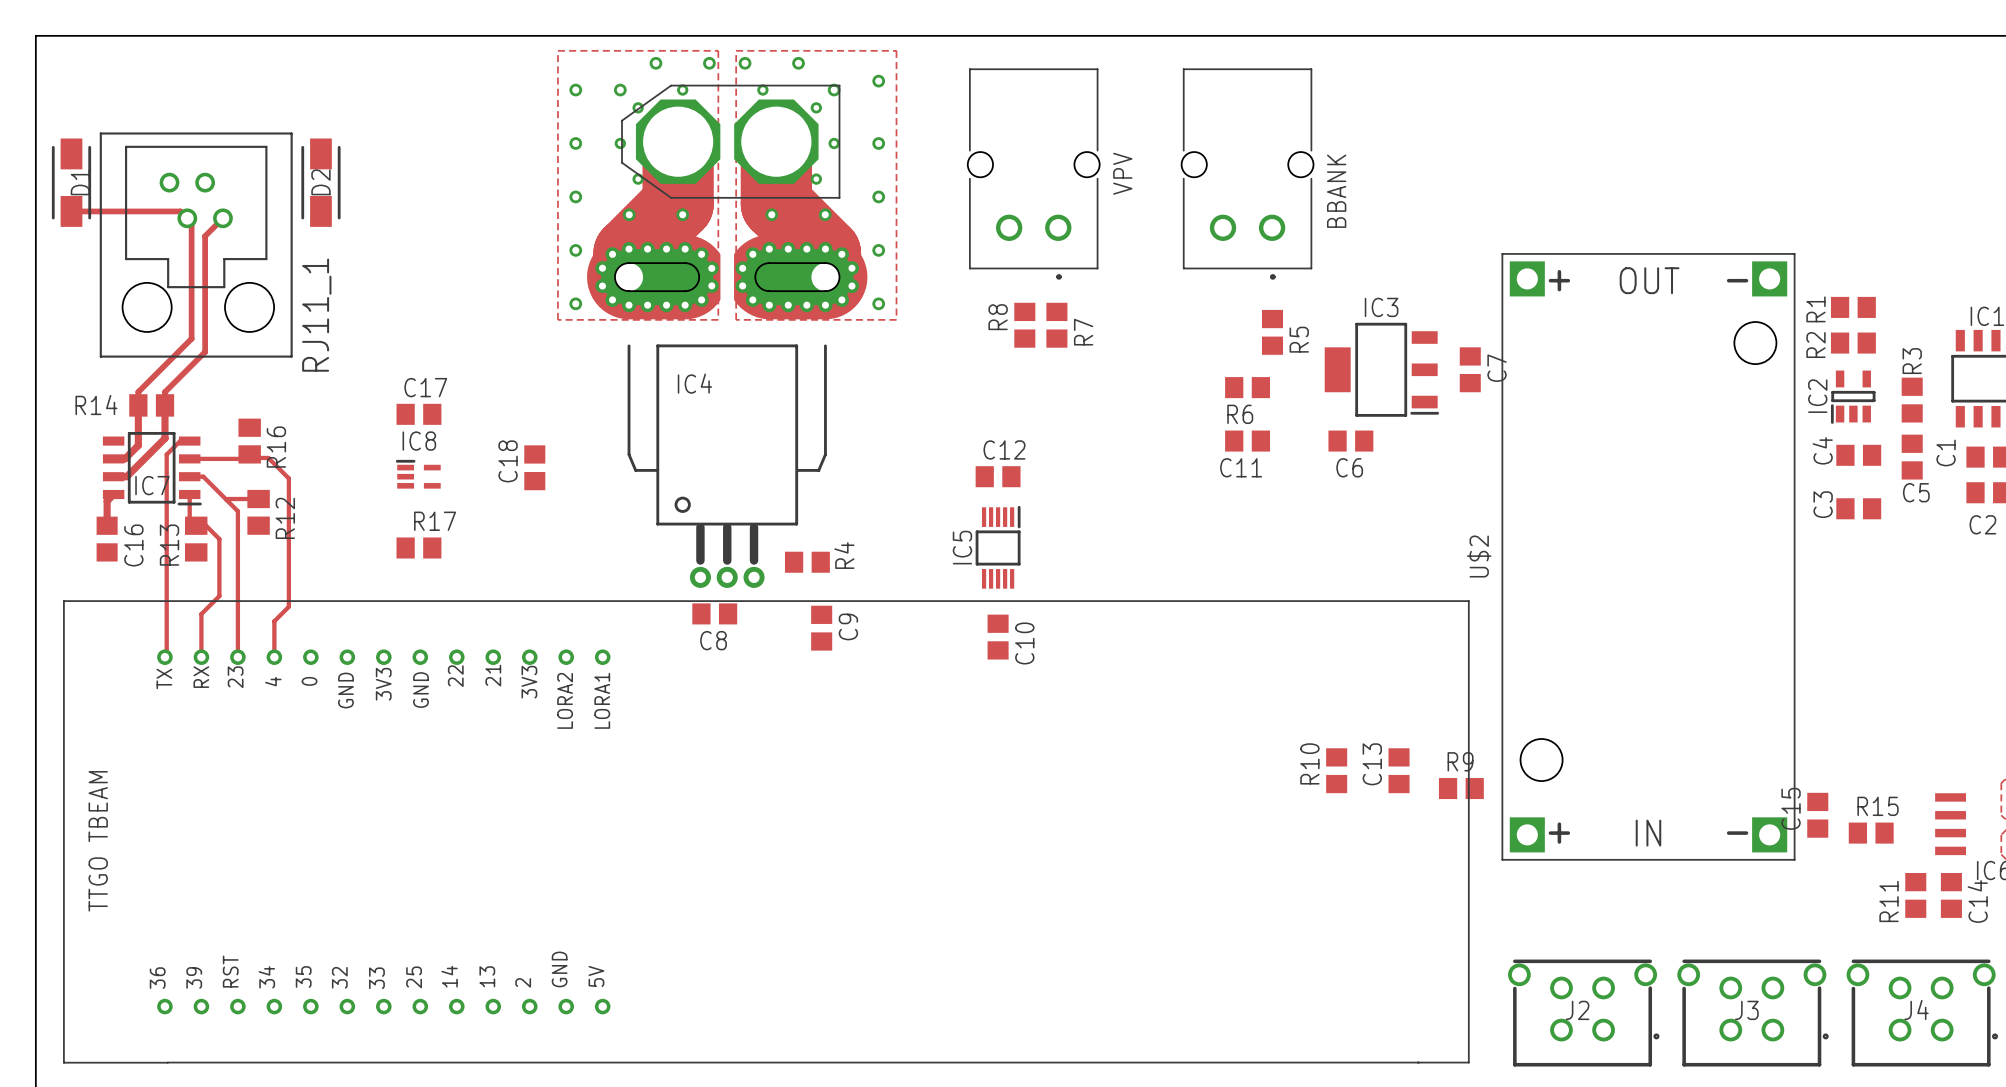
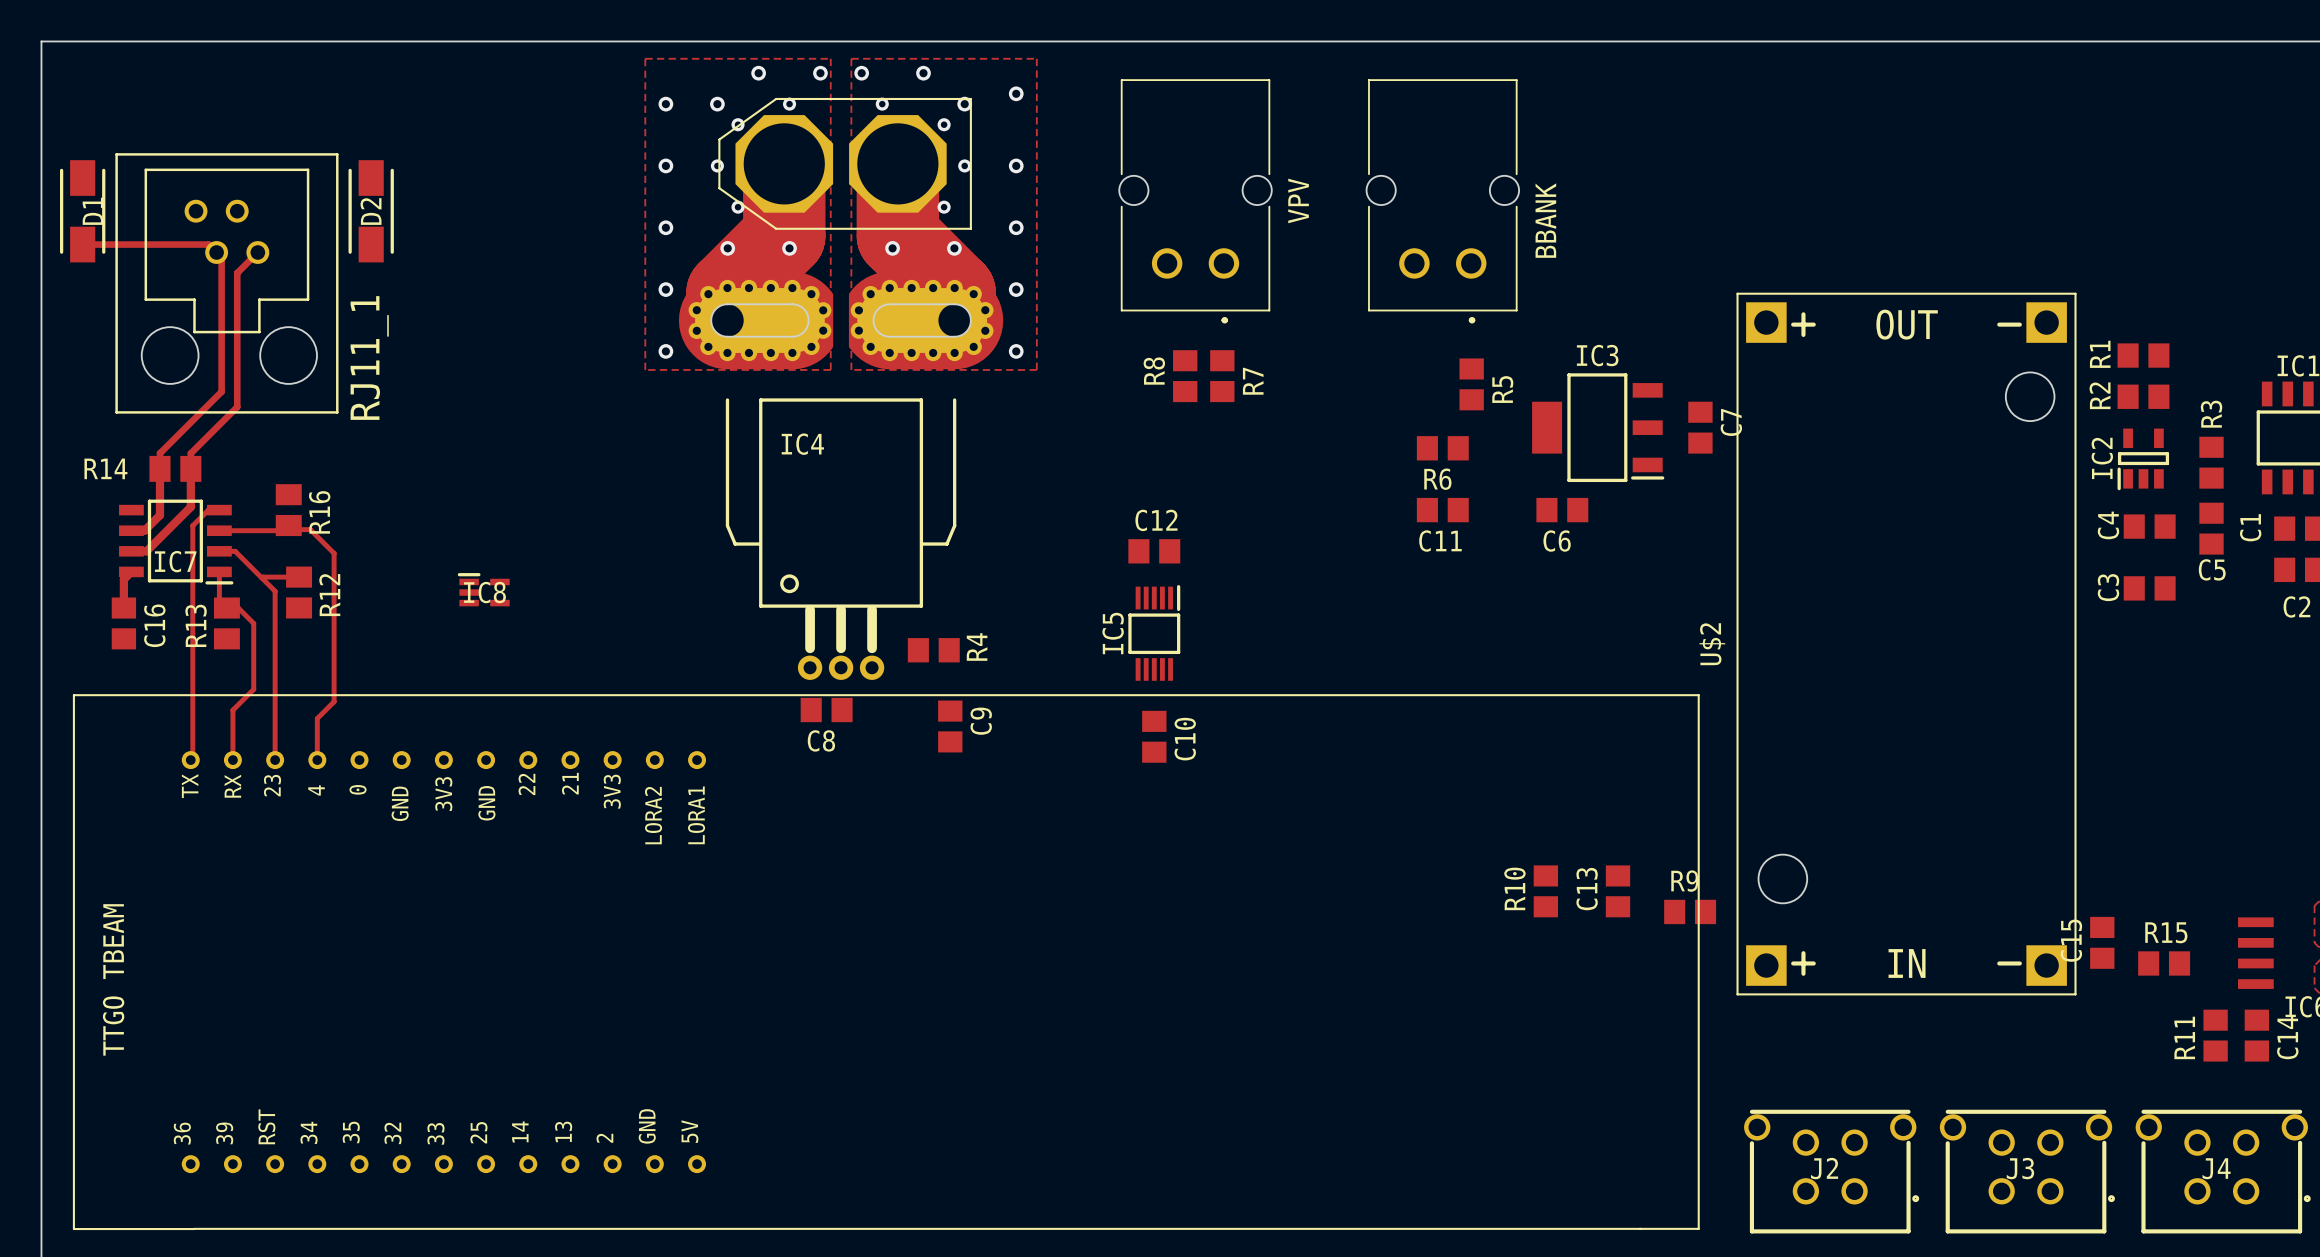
C17: (418, 414) -> none
IC8 name position: IC8 (419, 441) -> IC8 (484, 592)
C18: (534, 467) -> none
IC8 position: (418, 474) -> (483, 589)
R17: (418, 547) -> none

